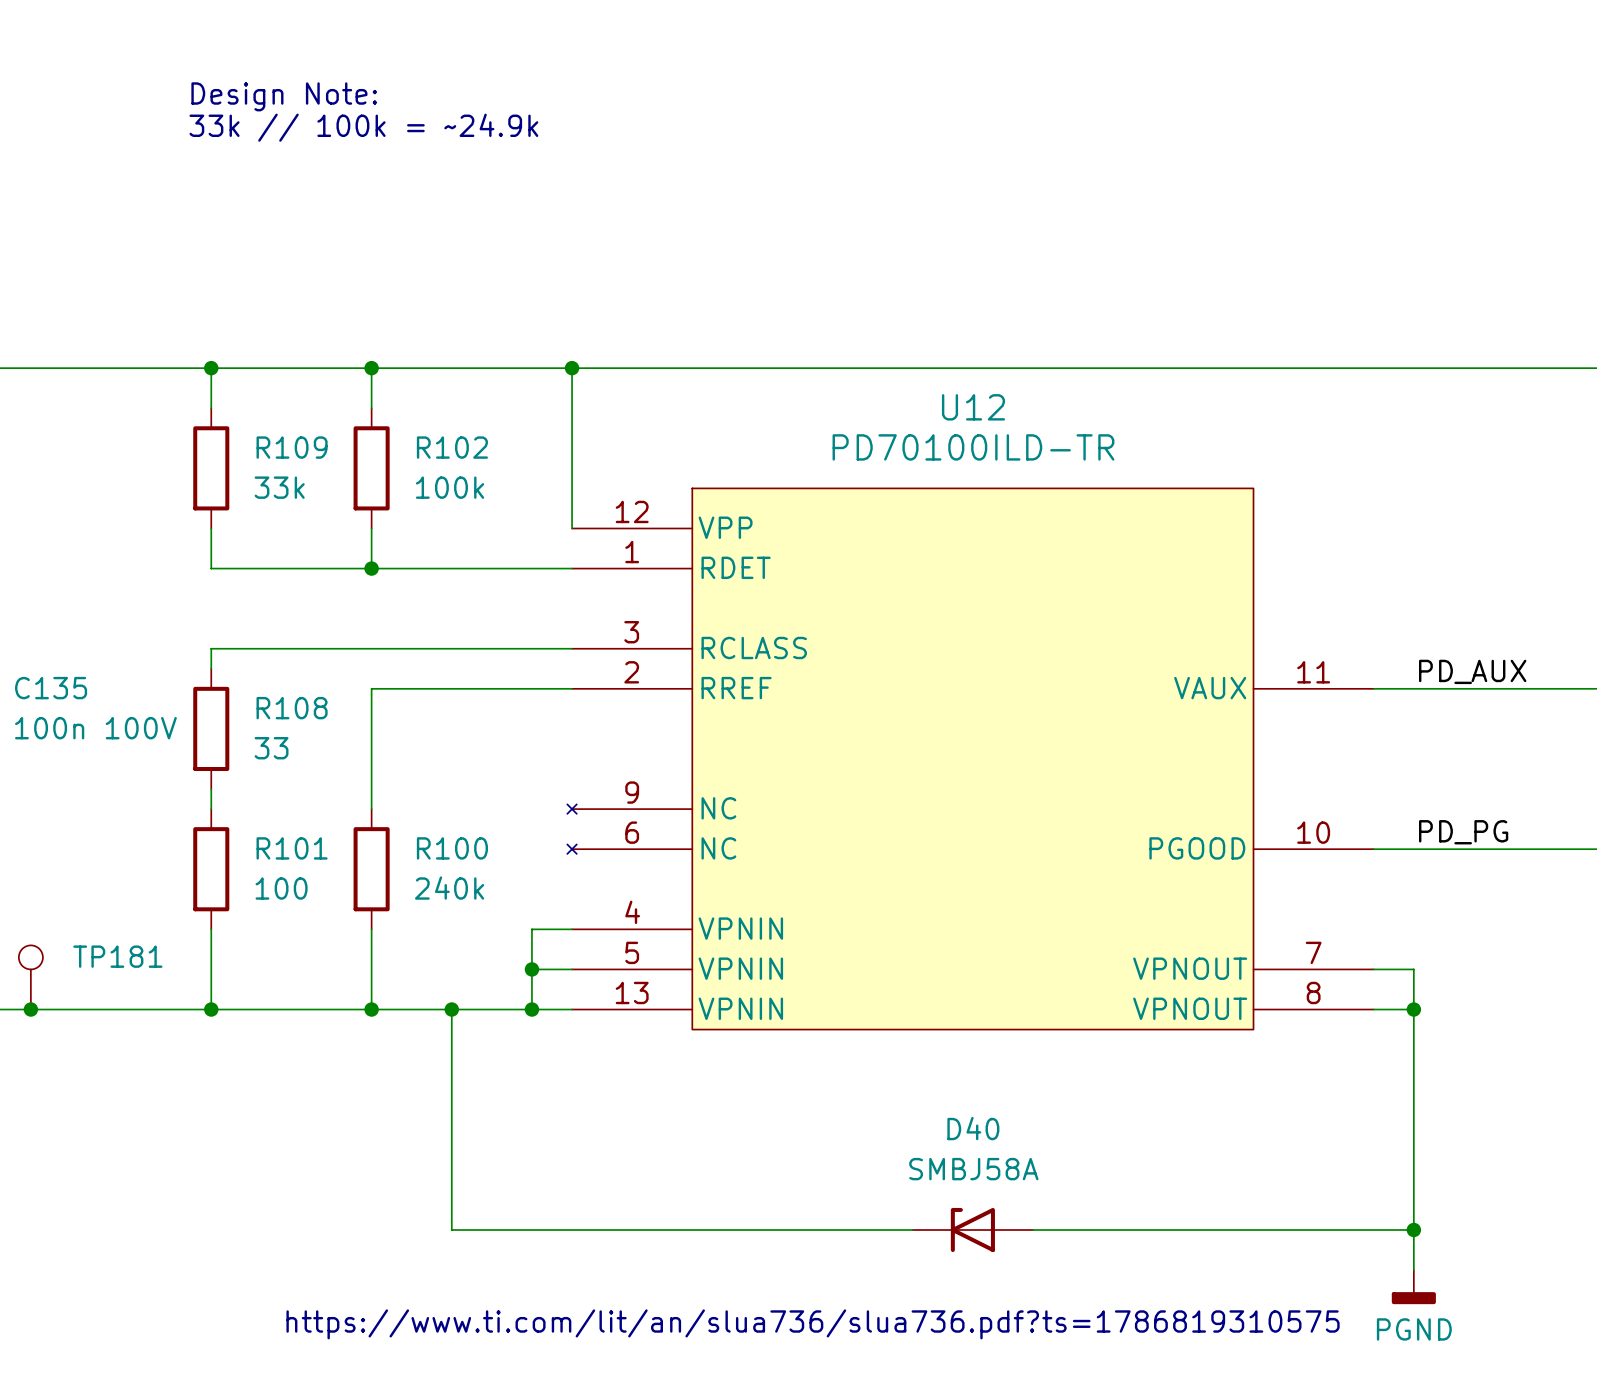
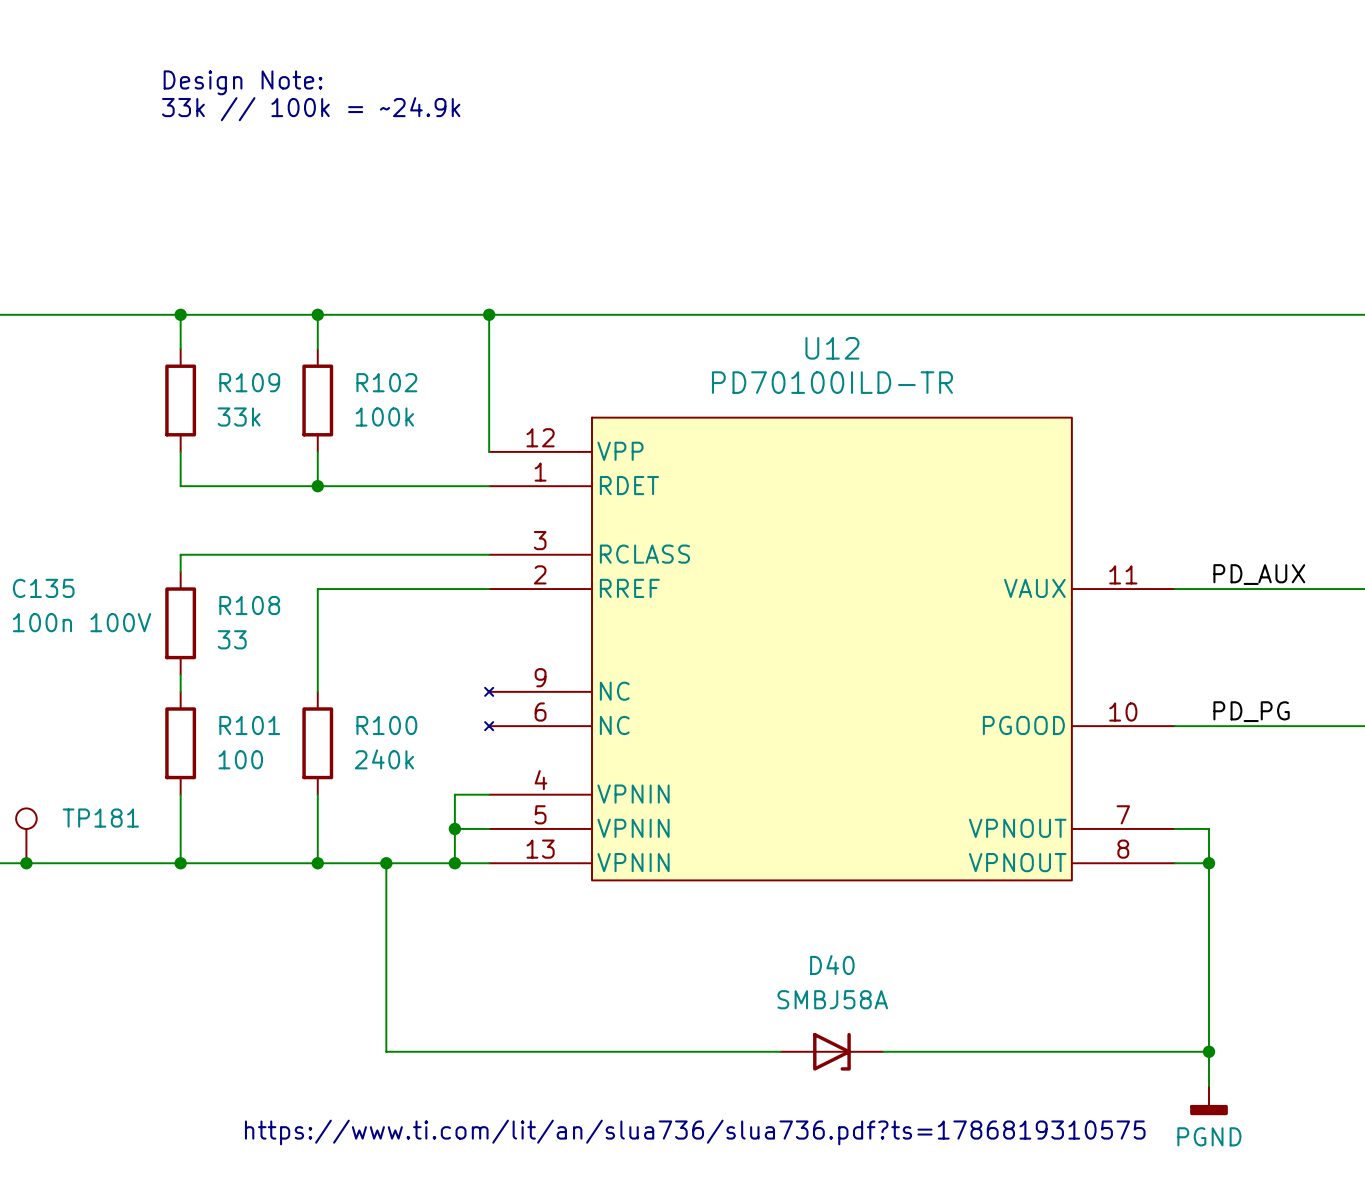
D40 rotation: 0° (972, 1229) -> 180° (831, 1051)

